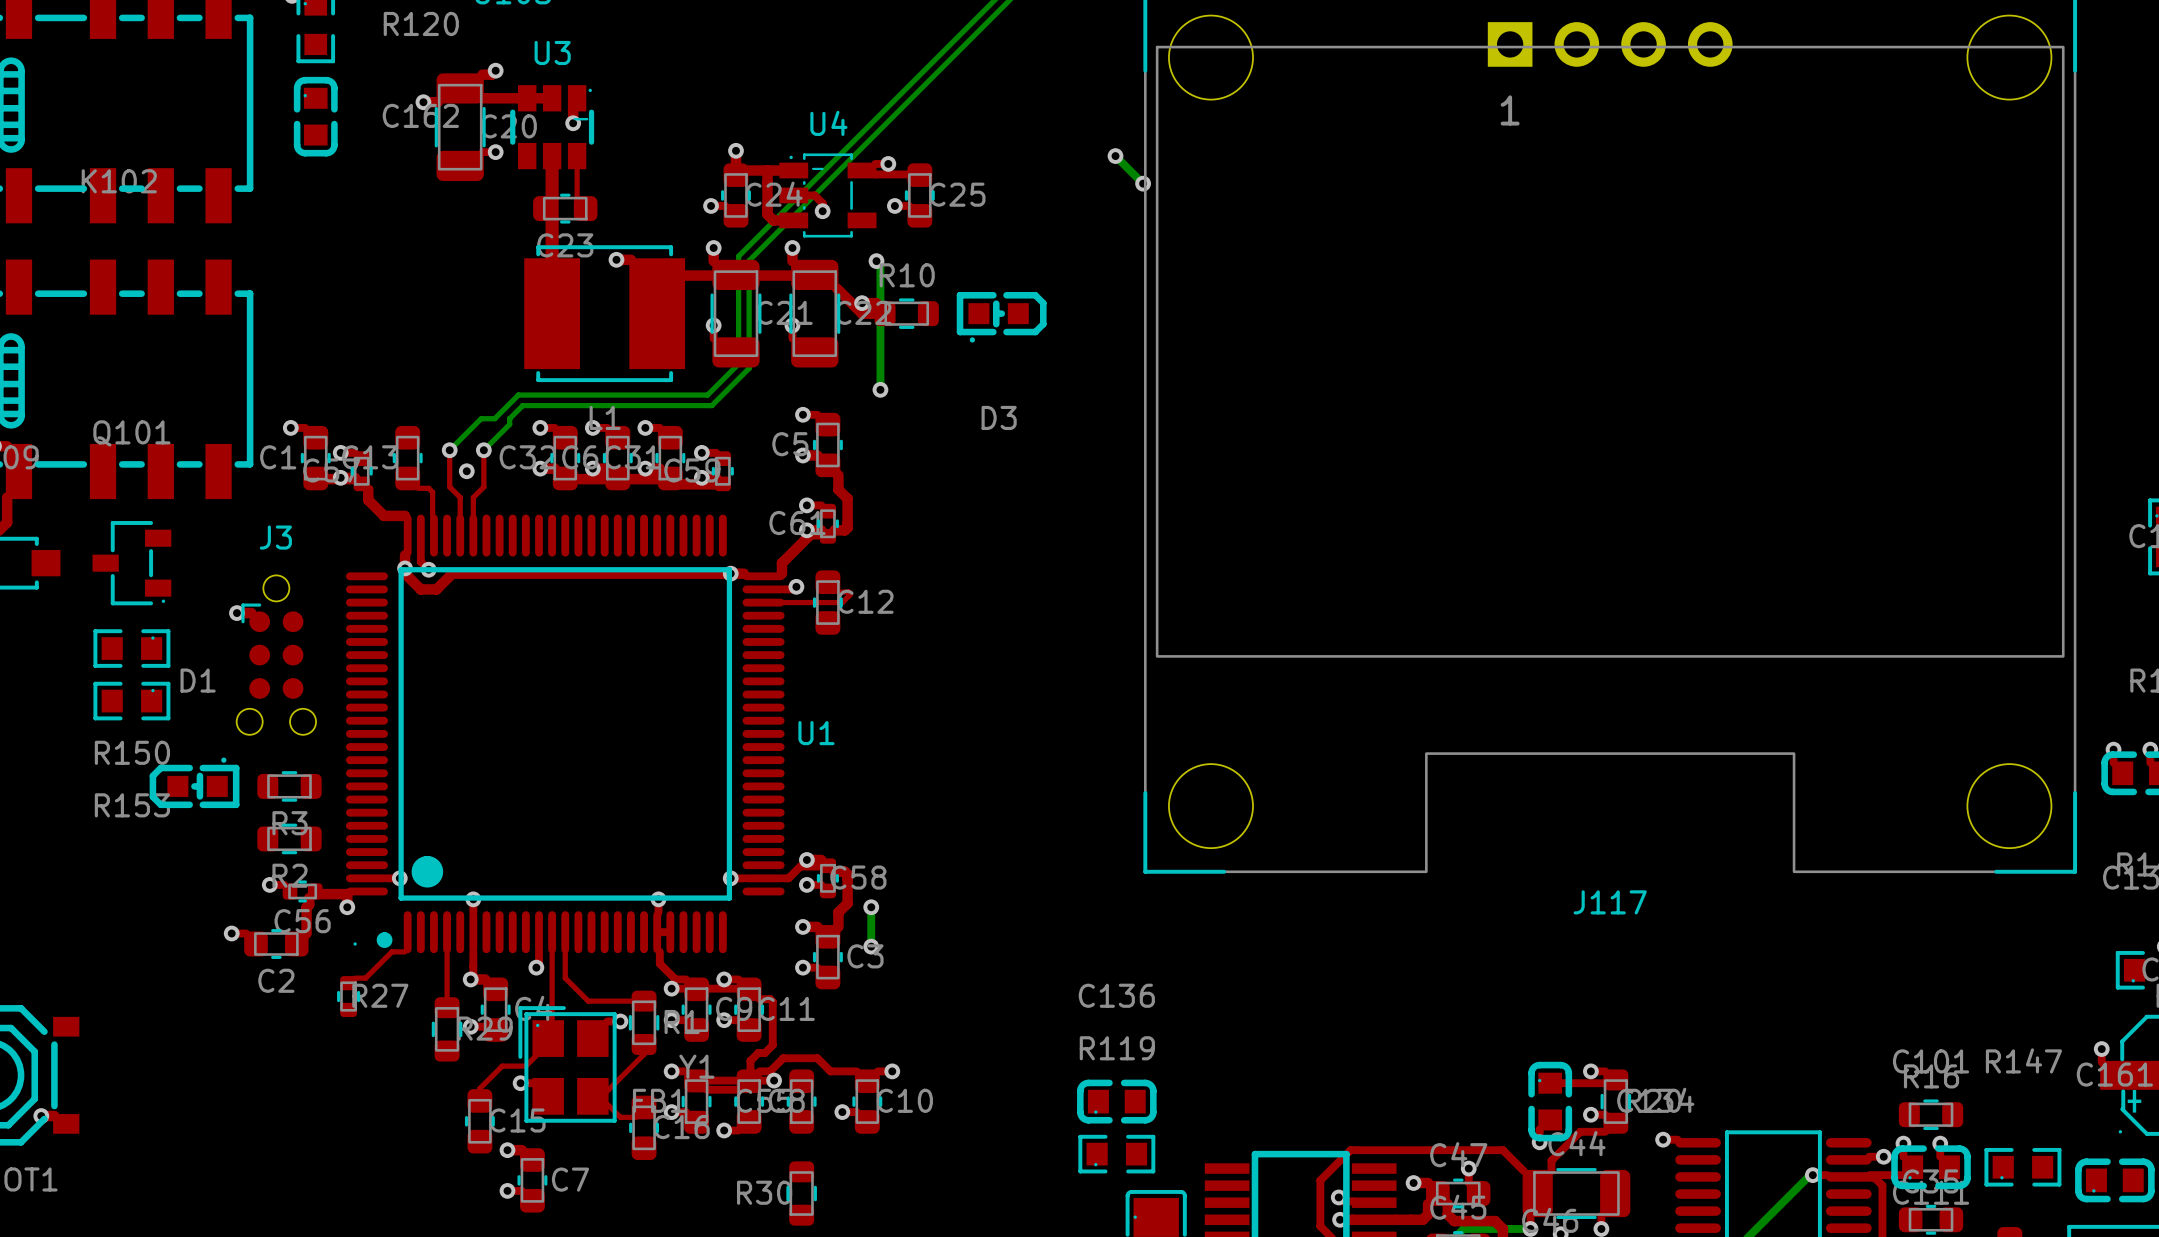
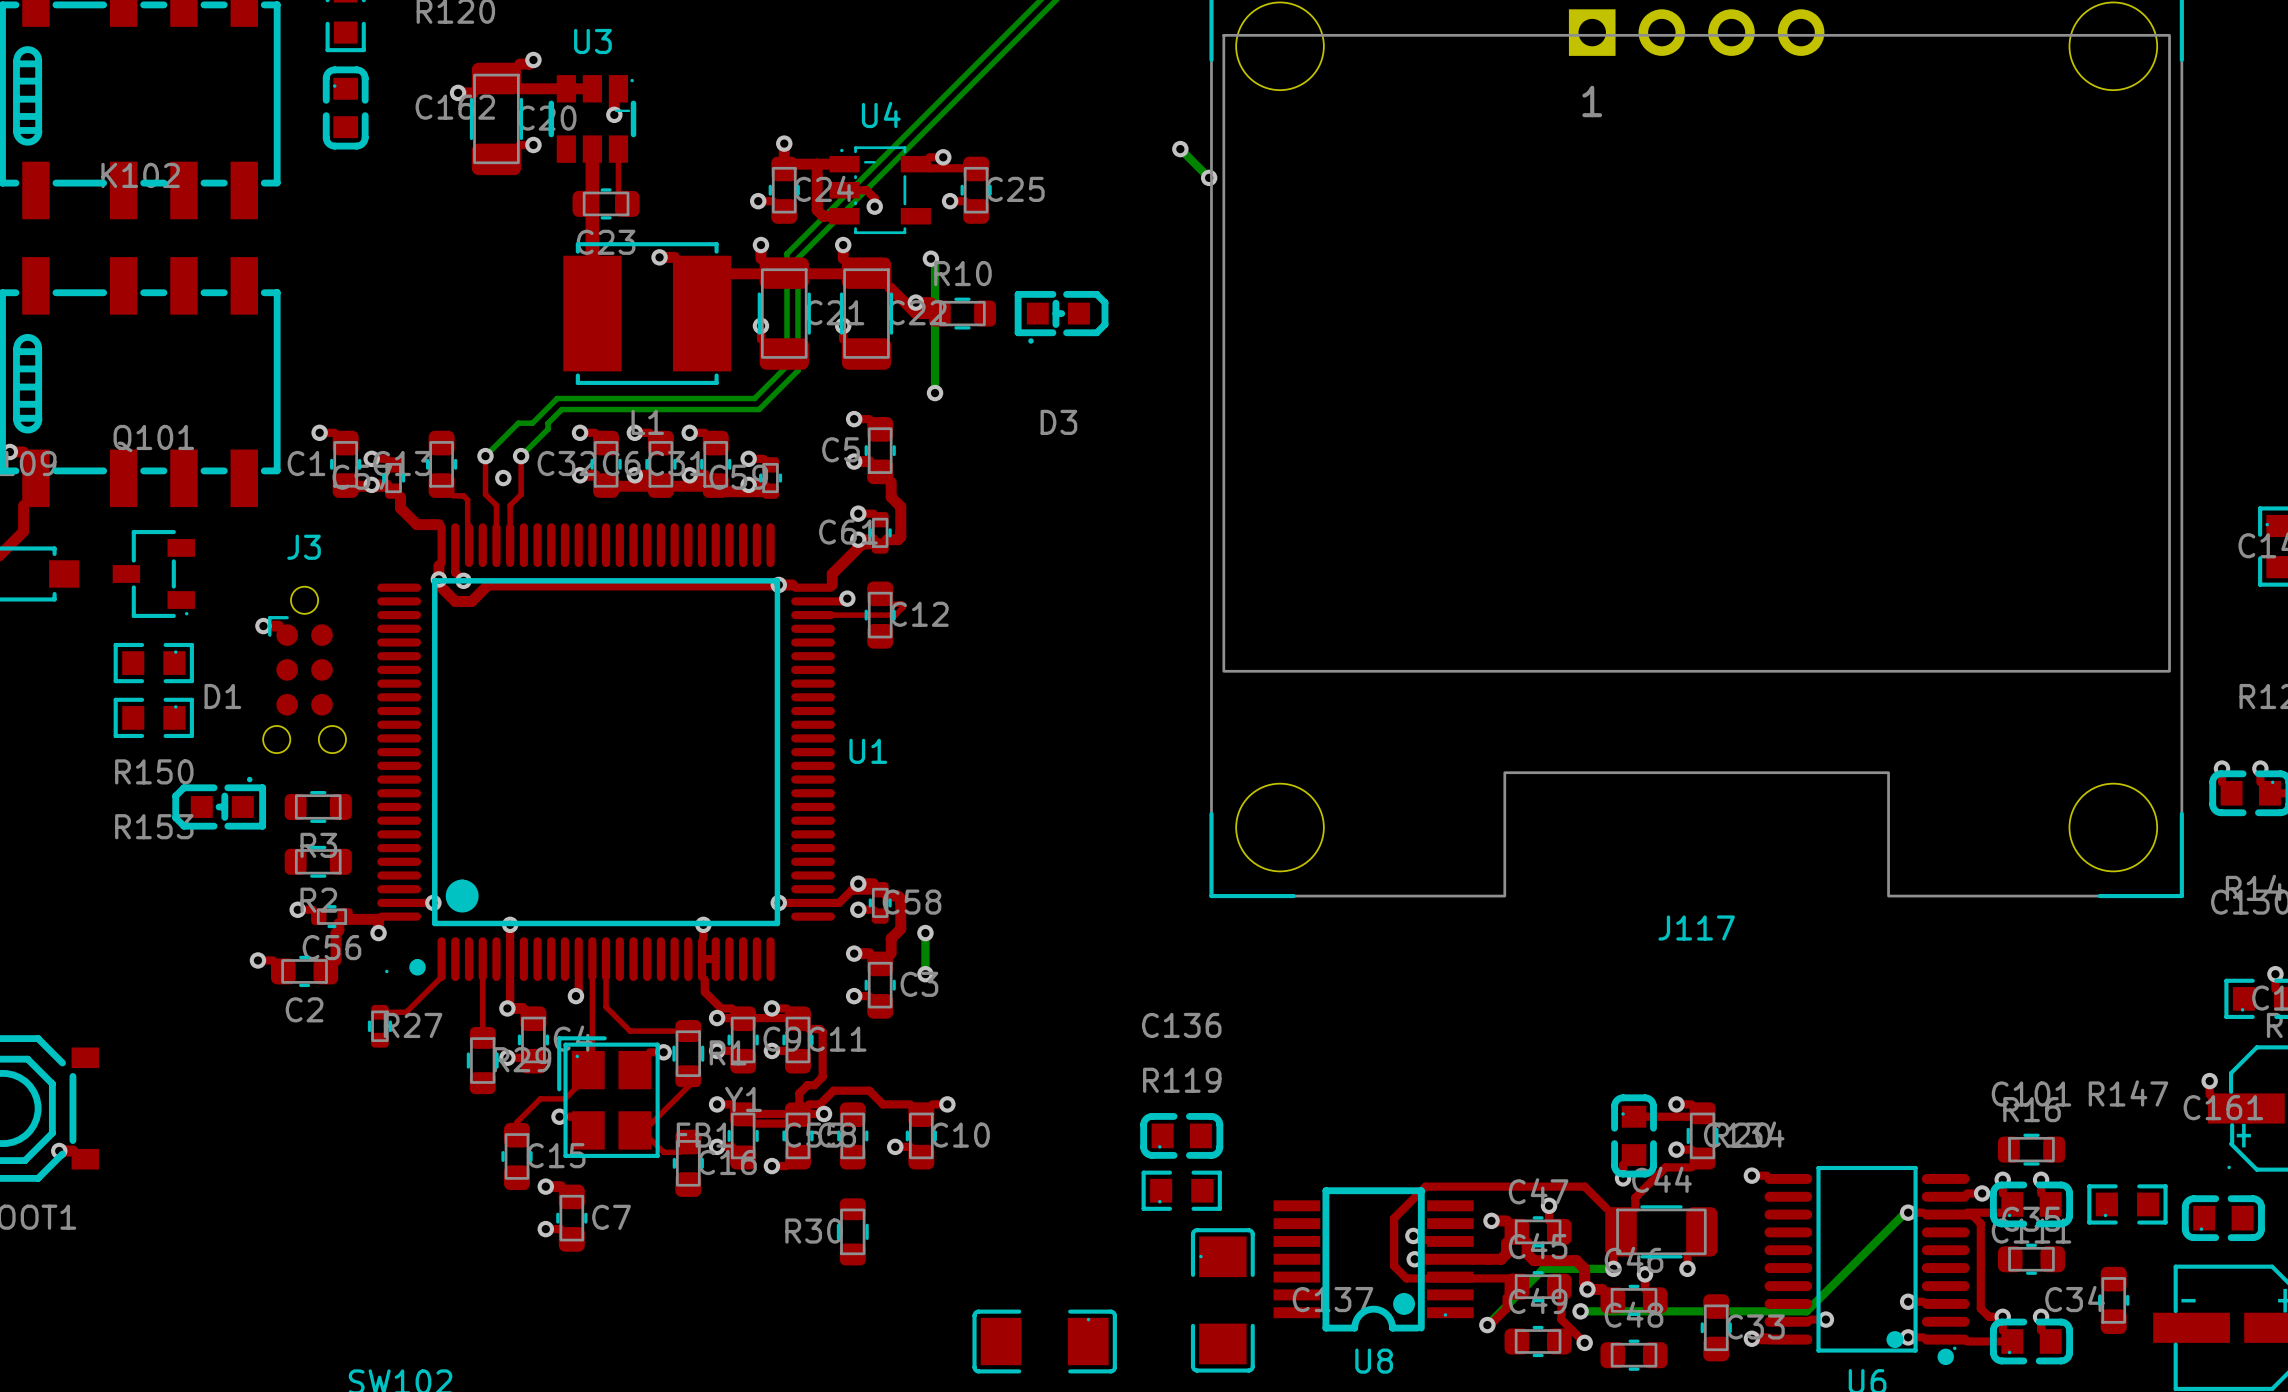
top track: none -> (441, 976) (406, 1012) (379, 1012)
top track: (405, 951) (391, 951) (365, 978) (355, 978) -> none

